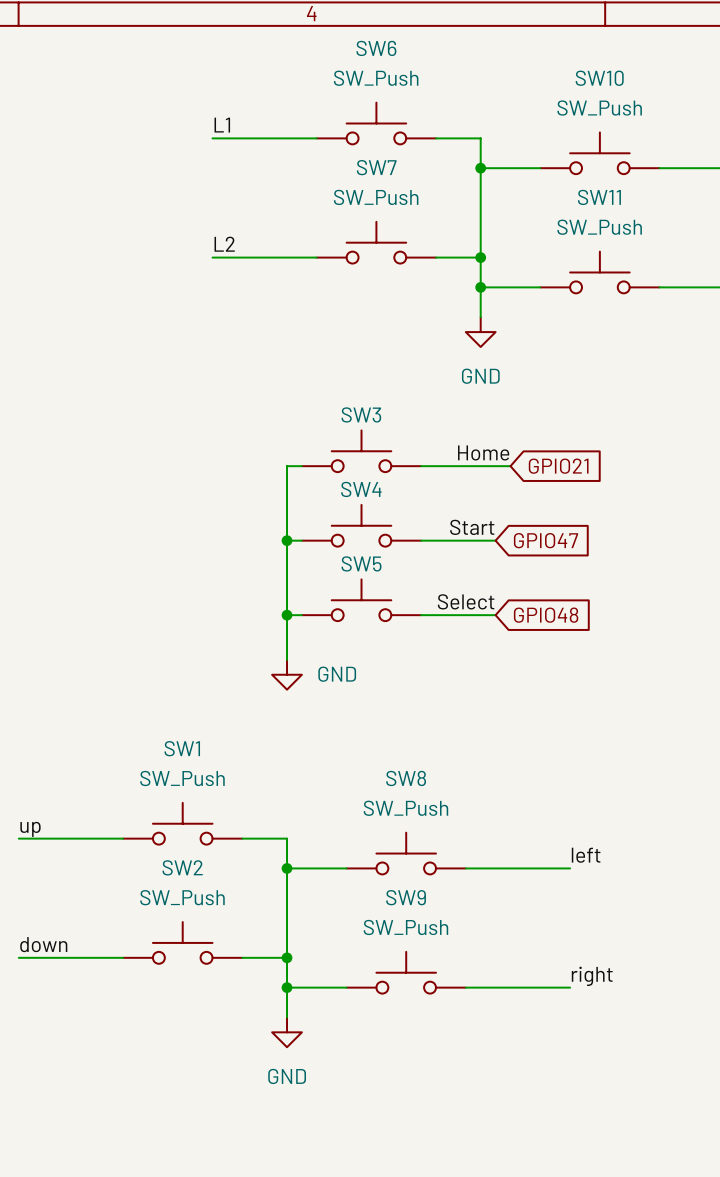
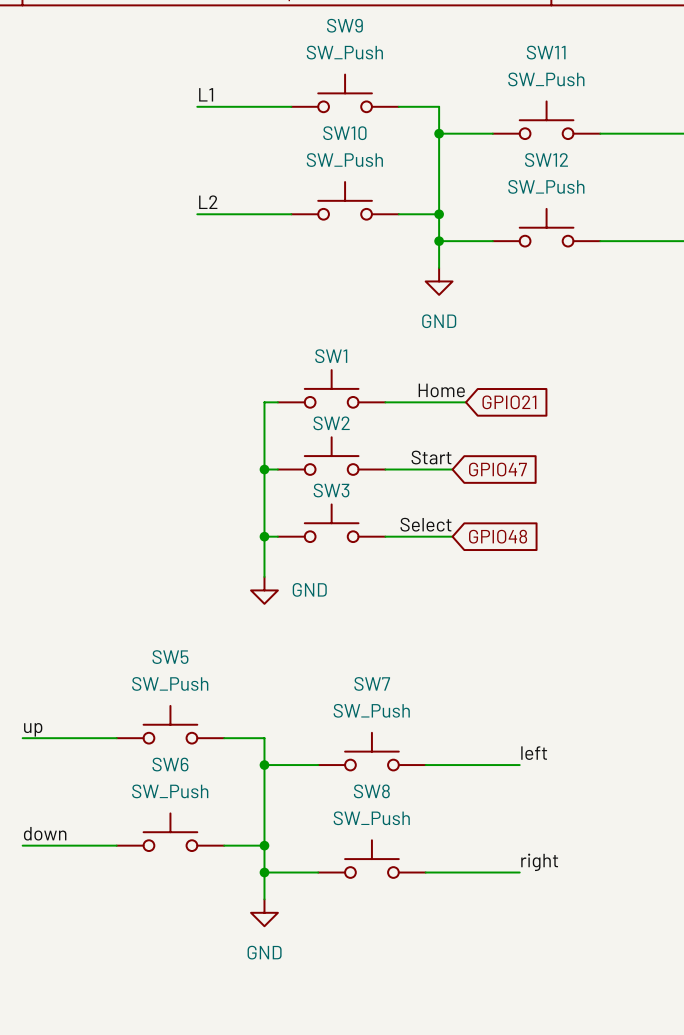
SW6 name: SW6 (376, 48) -> SW9 (344, 25)
SW10 name: SW10 (599, 78) -> SW11 (546, 52)
SW7 name: SW7 (376, 167) -> SW10 (344, 133)
SW11 name: SW11 (599, 197) -> SW12 (546, 160)
SW3 name: SW3 (361, 414) -> SW1 (331, 356)
SW4 name: SW4 (361, 489) -> SW2 (331, 423)
SW5 name: SW5 (361, 563) -> SW3 (331, 490)
SW1 name: SW1 (182, 748) -> SW5 (170, 657)
SW8 name: SW8 (406, 778) -> SW7 (372, 683)
SW2 name: SW2 (182, 867) -> SW6 (170, 764)
SW9 name: SW9 (406, 897) -> SW8 (371, 791)

